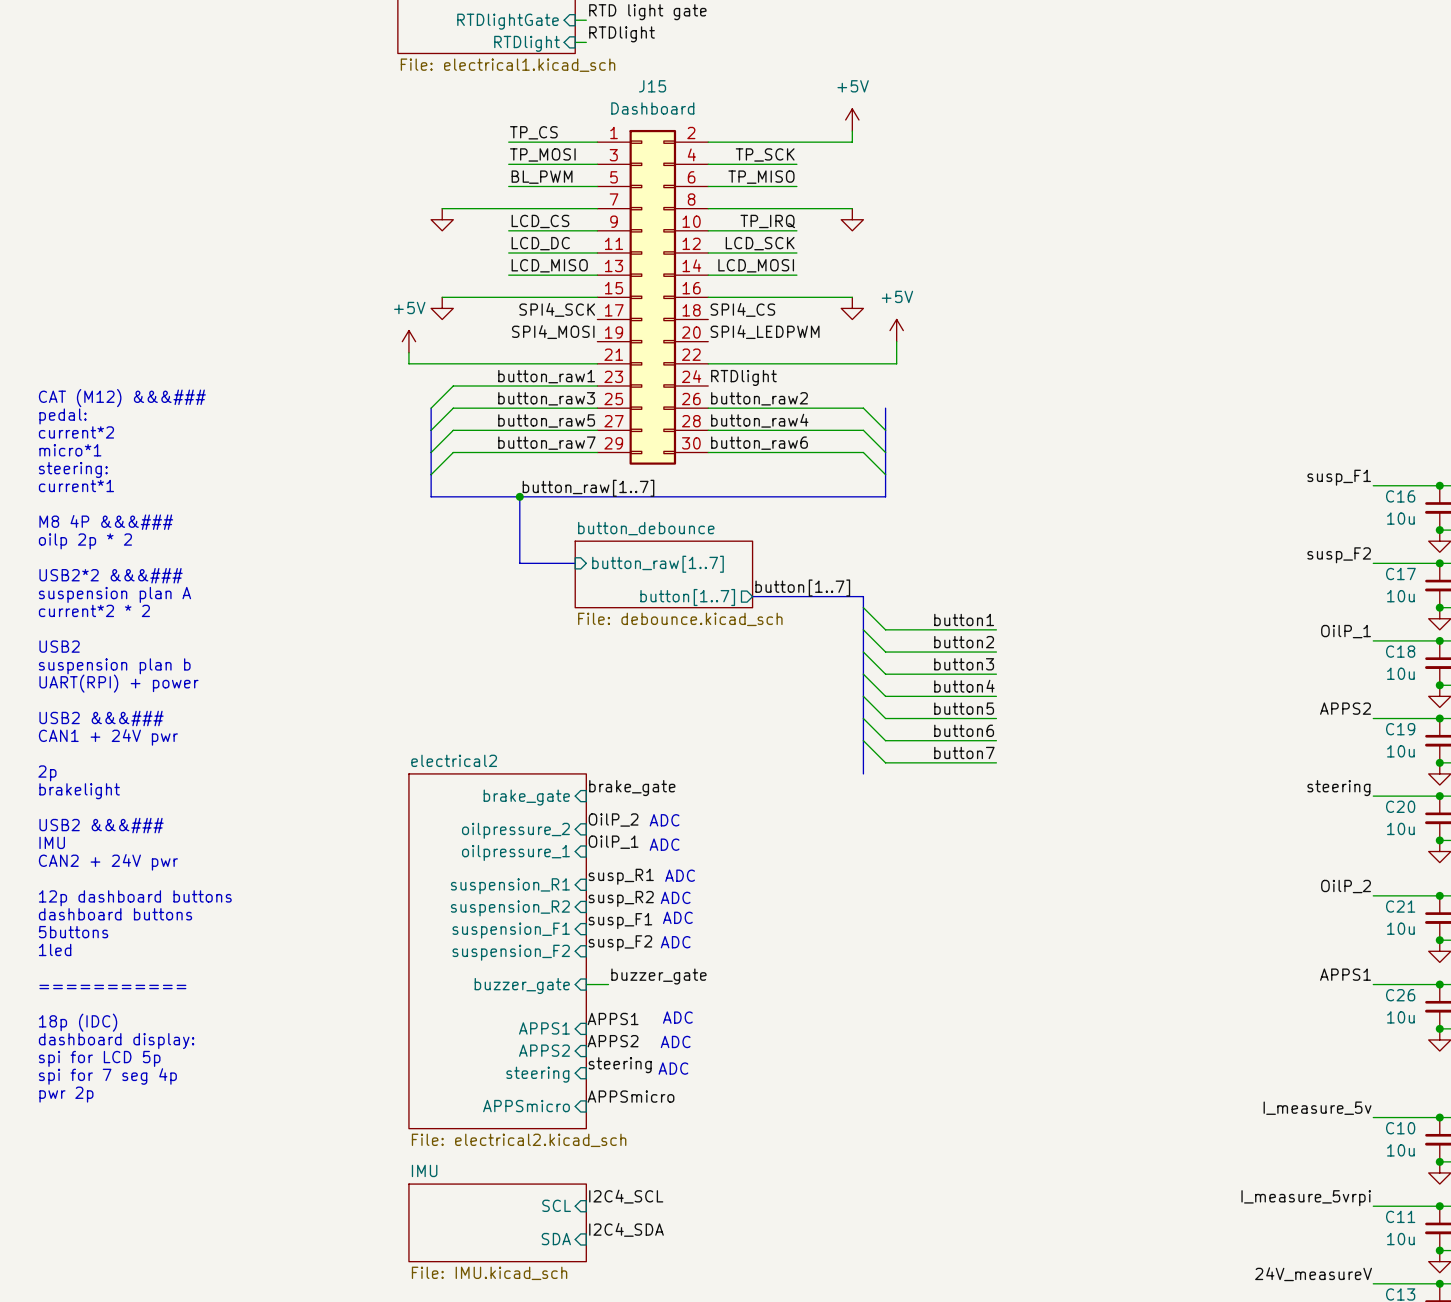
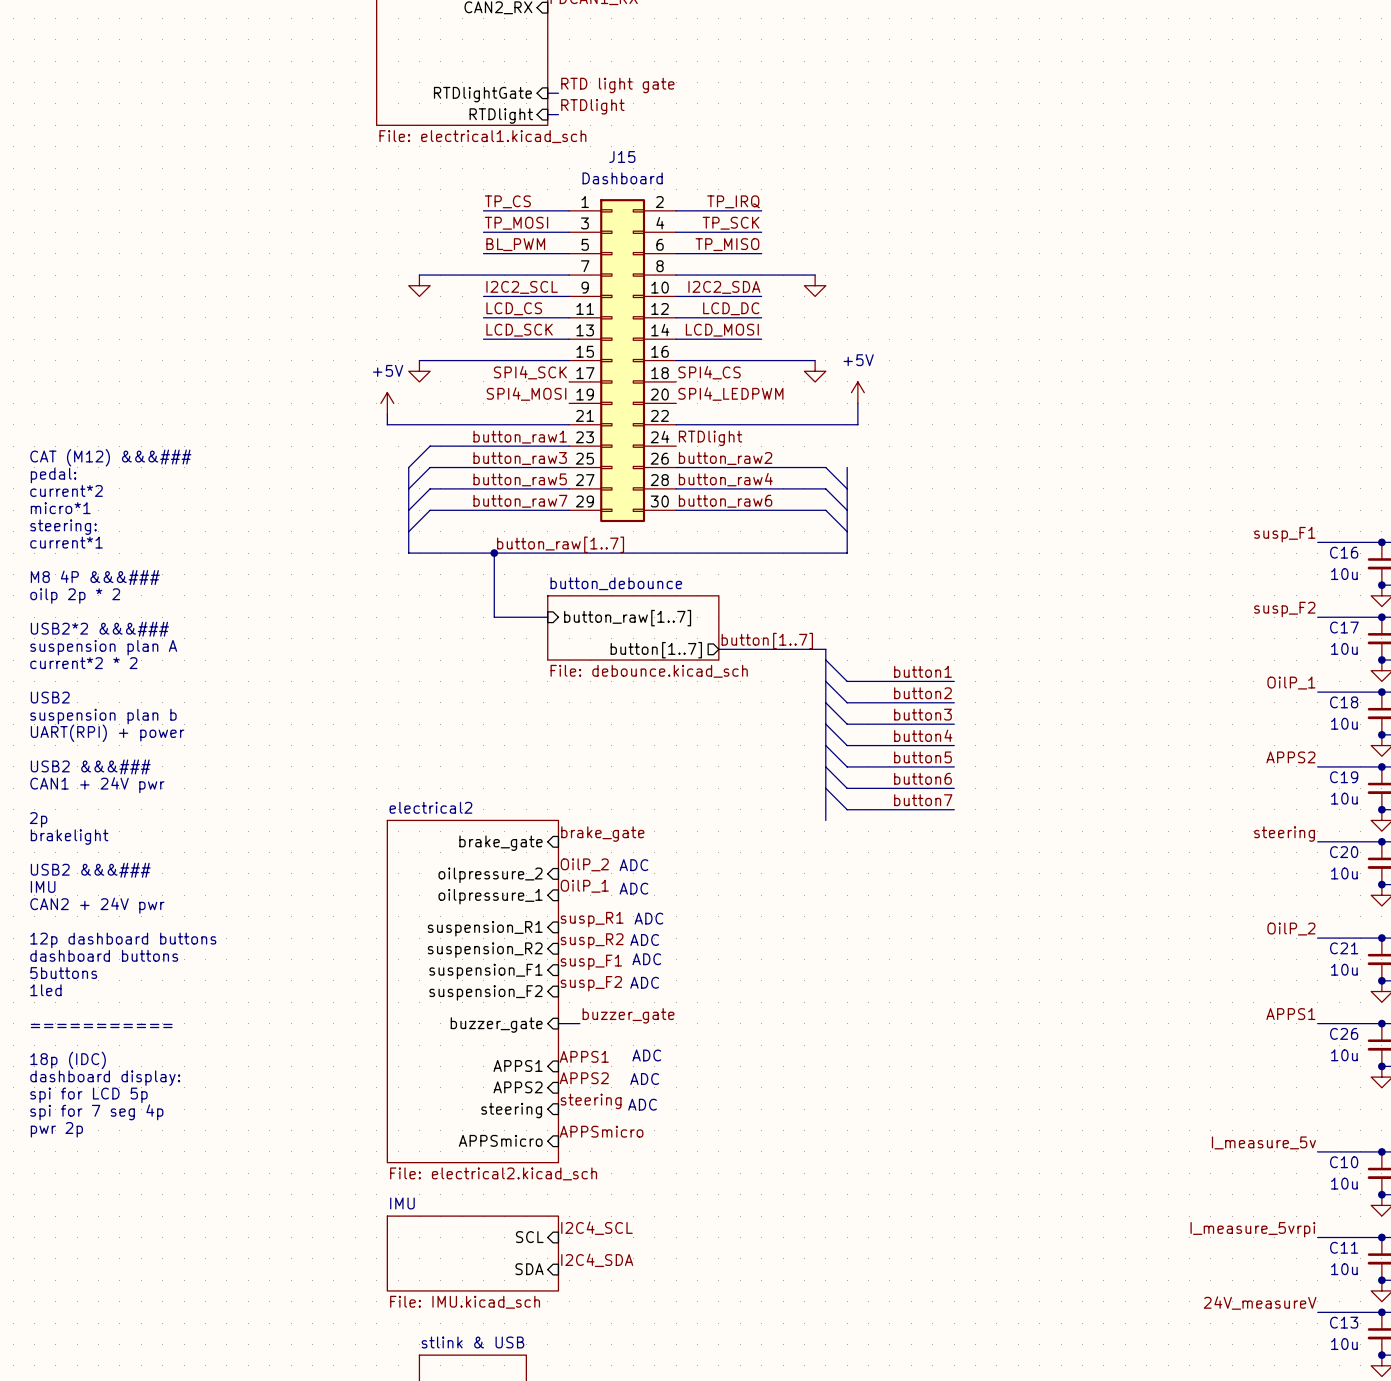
power symbol: +5V (852, 119) -> none
wire: (852, 131) (852, 142) (796, 142) -> none
label: none -> TP_IRQ (733, 201)
label: LCD_CS (540, 221) -> I2C2_SCL (522, 287)
label: TP_IRQ (767, 221) -> I2C2_SDA (724, 287)
label: LCD_DC (540, 243) -> LCD_CS (514, 308)
label: LCD_SCK (760, 243) -> LCD_DC (731, 308)
label: LCD_MISO (549, 265) -> LCD_SCK (519, 330)

